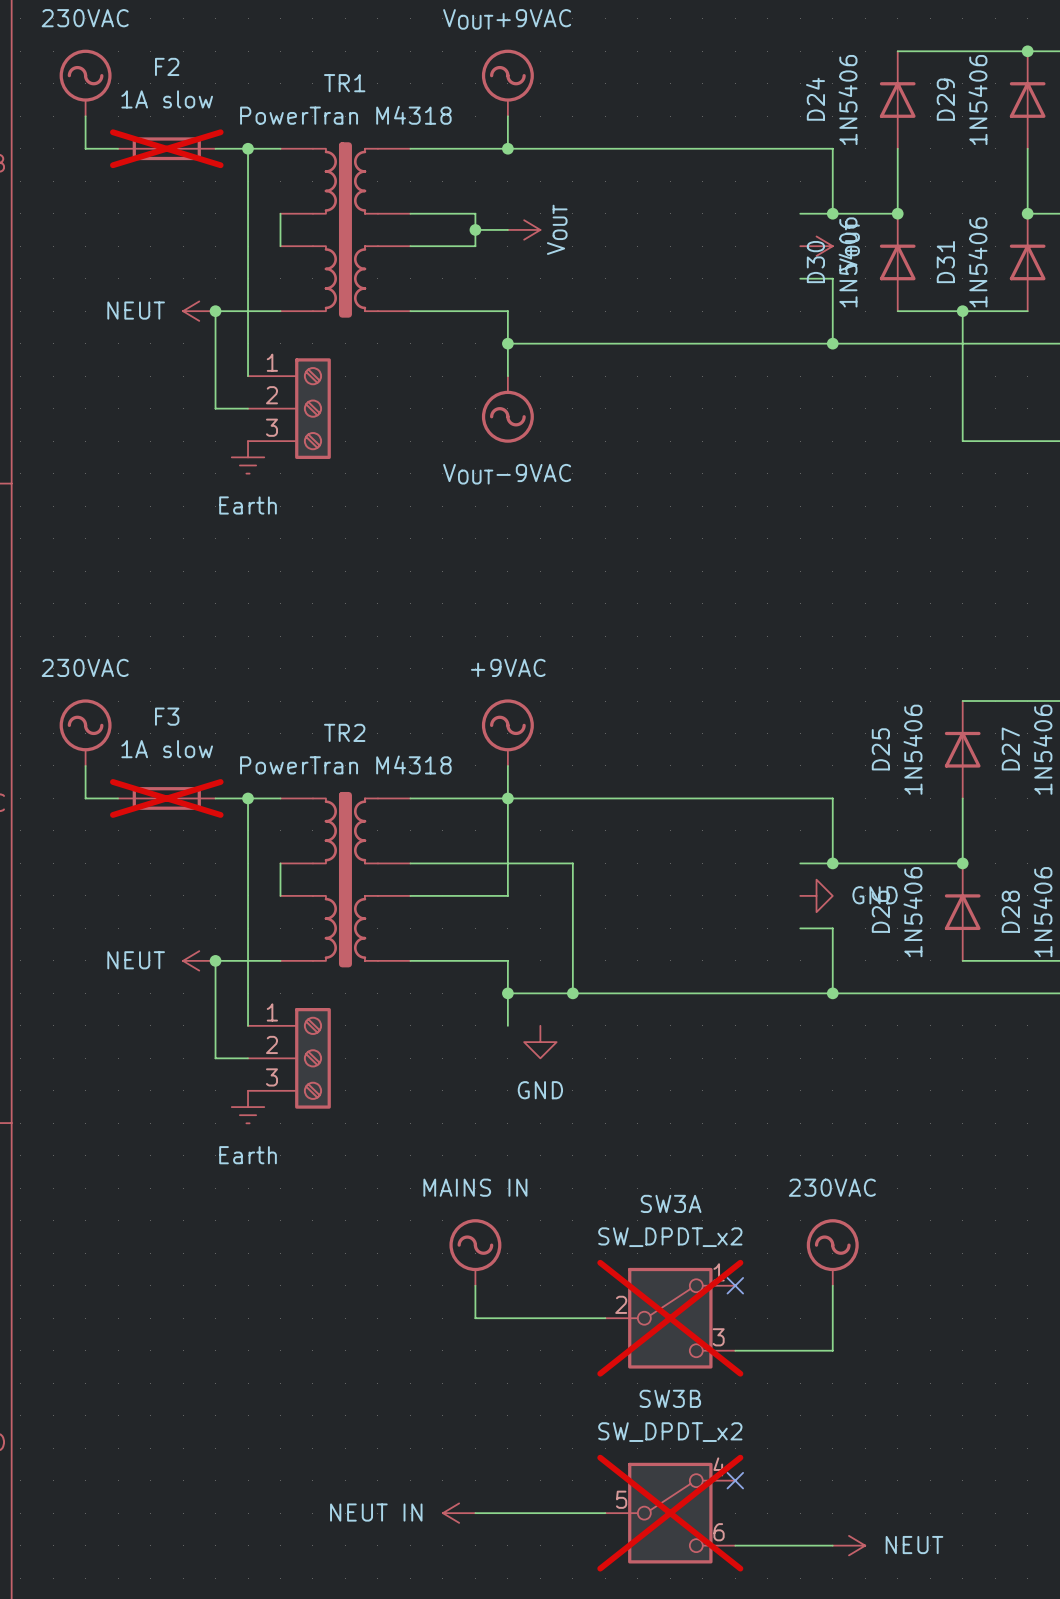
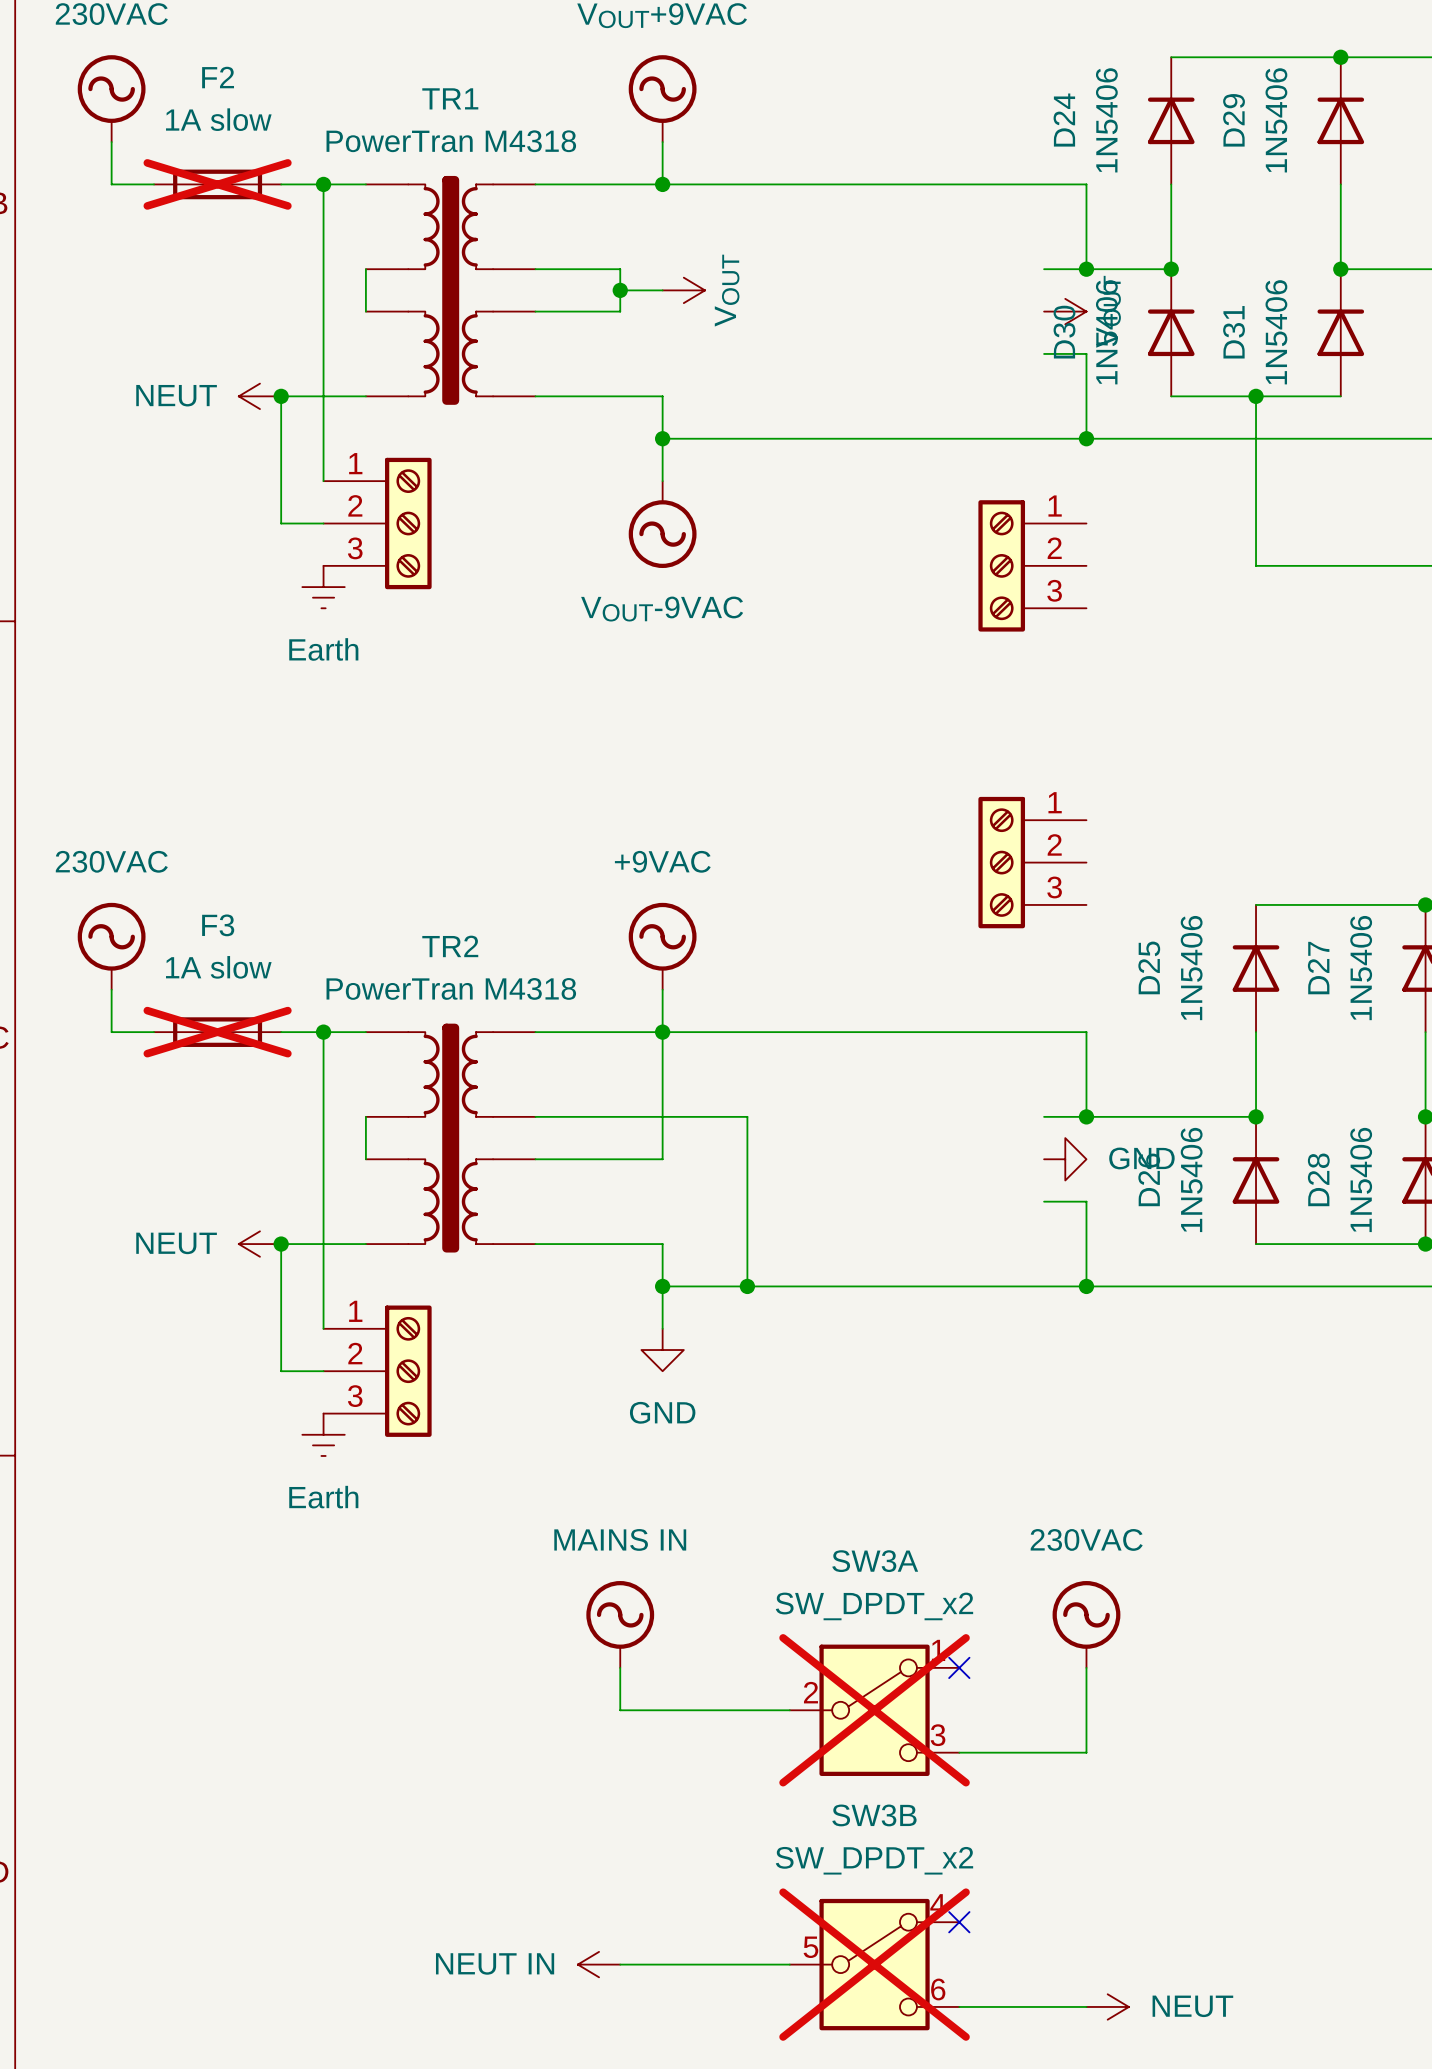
part: none -> (1032, 565)
part: none -> (1032, 862)
power symbol position: GND (540, 1042) -> GND (662, 1350)

